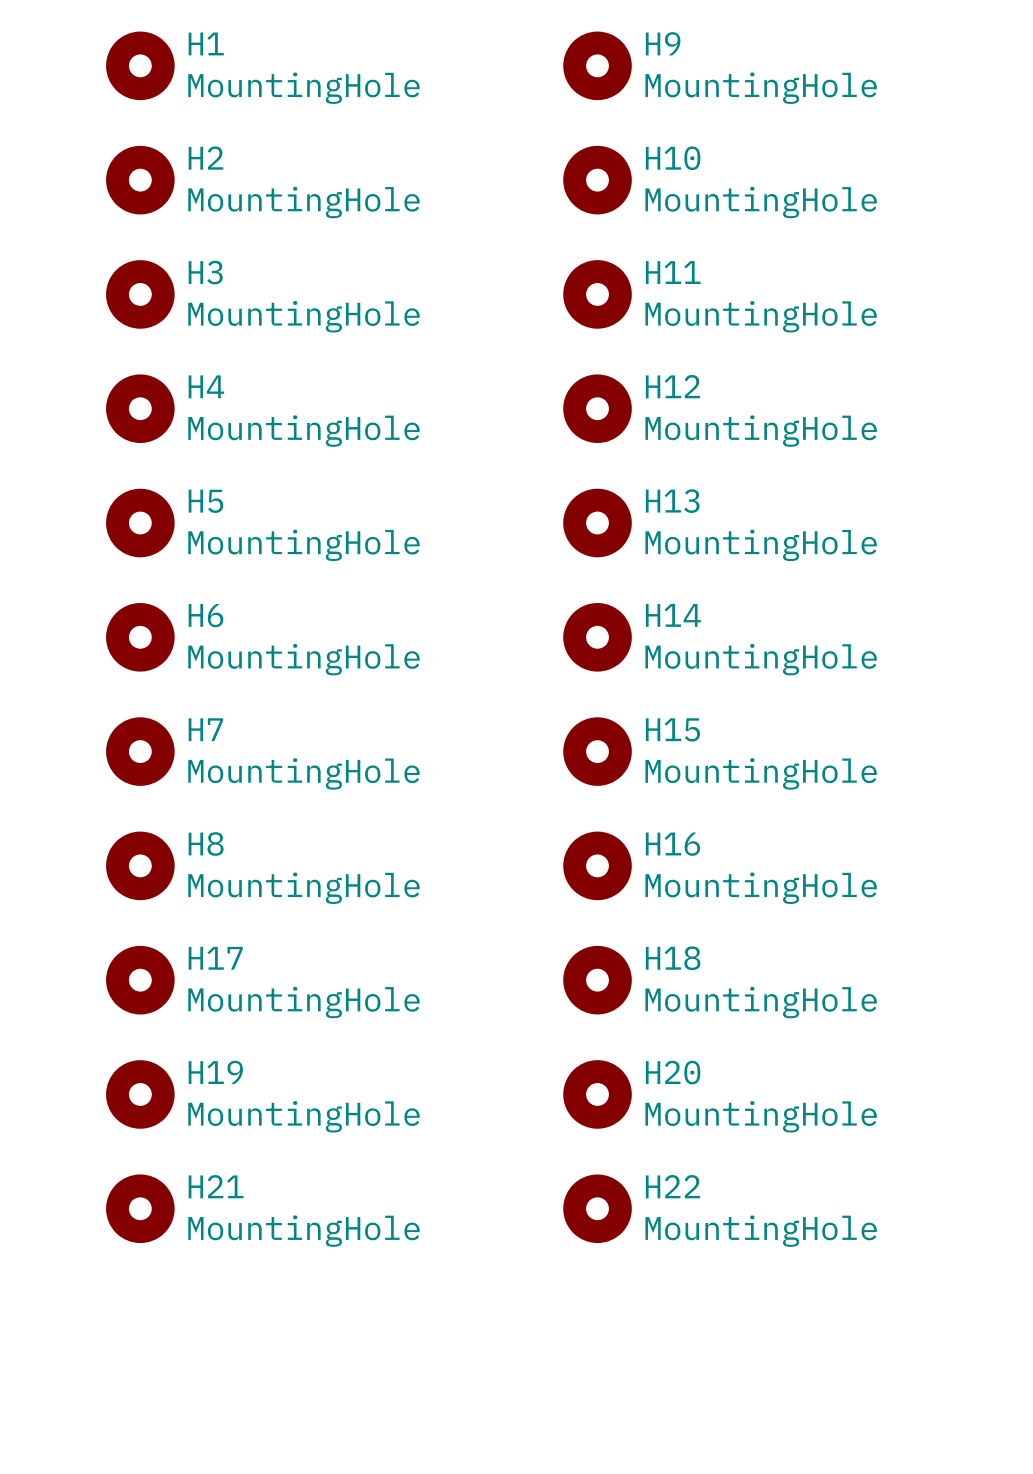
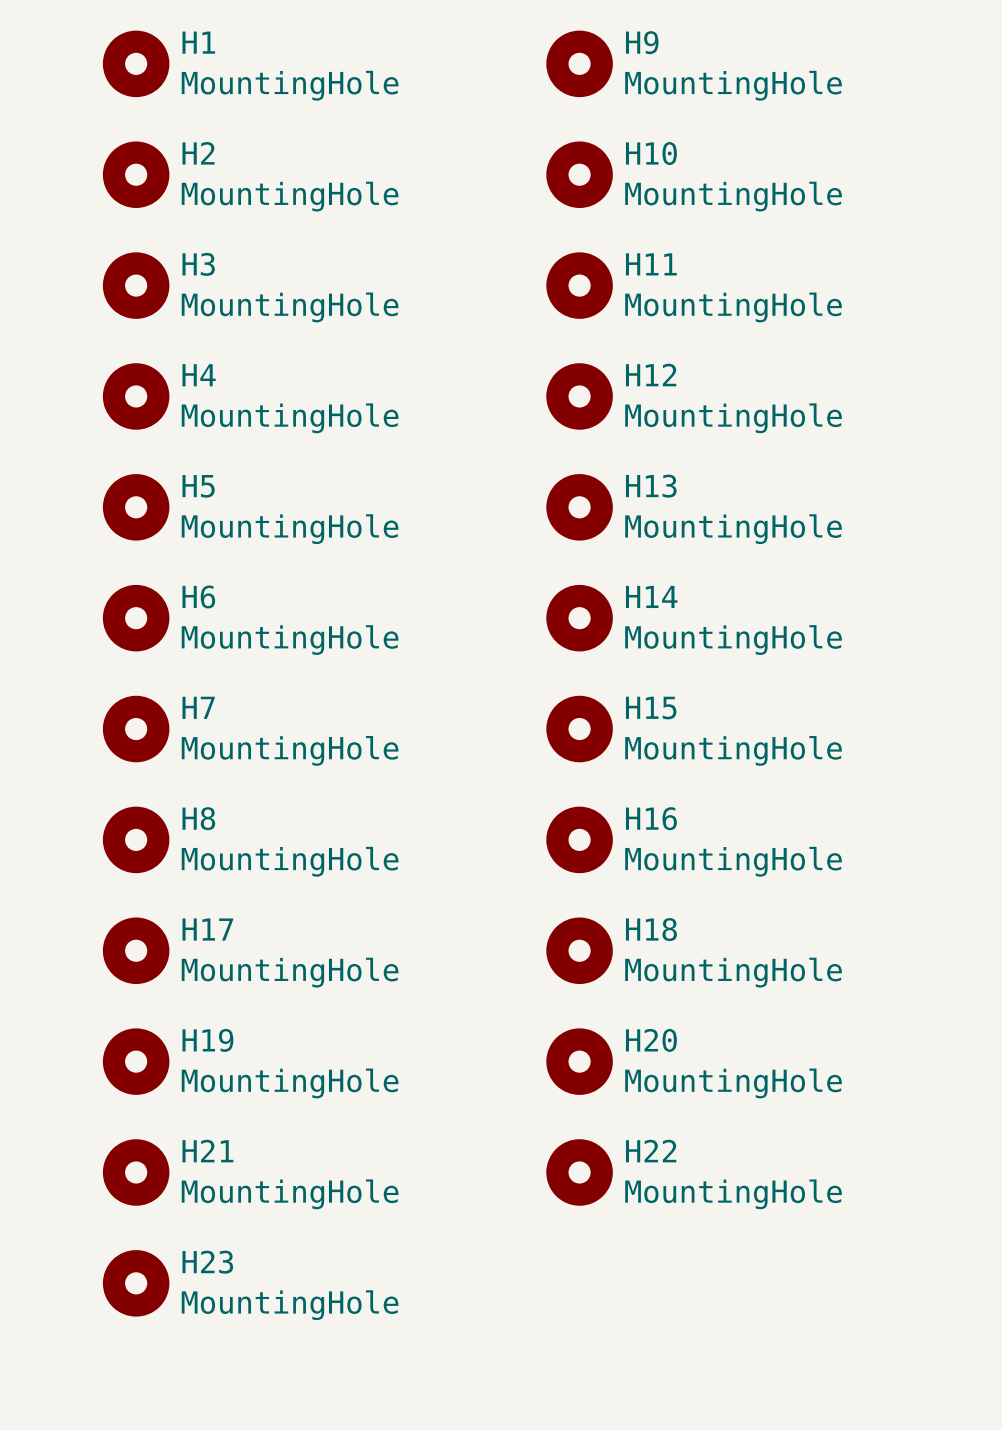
H23: none -> MountingHole (136, 1283)

